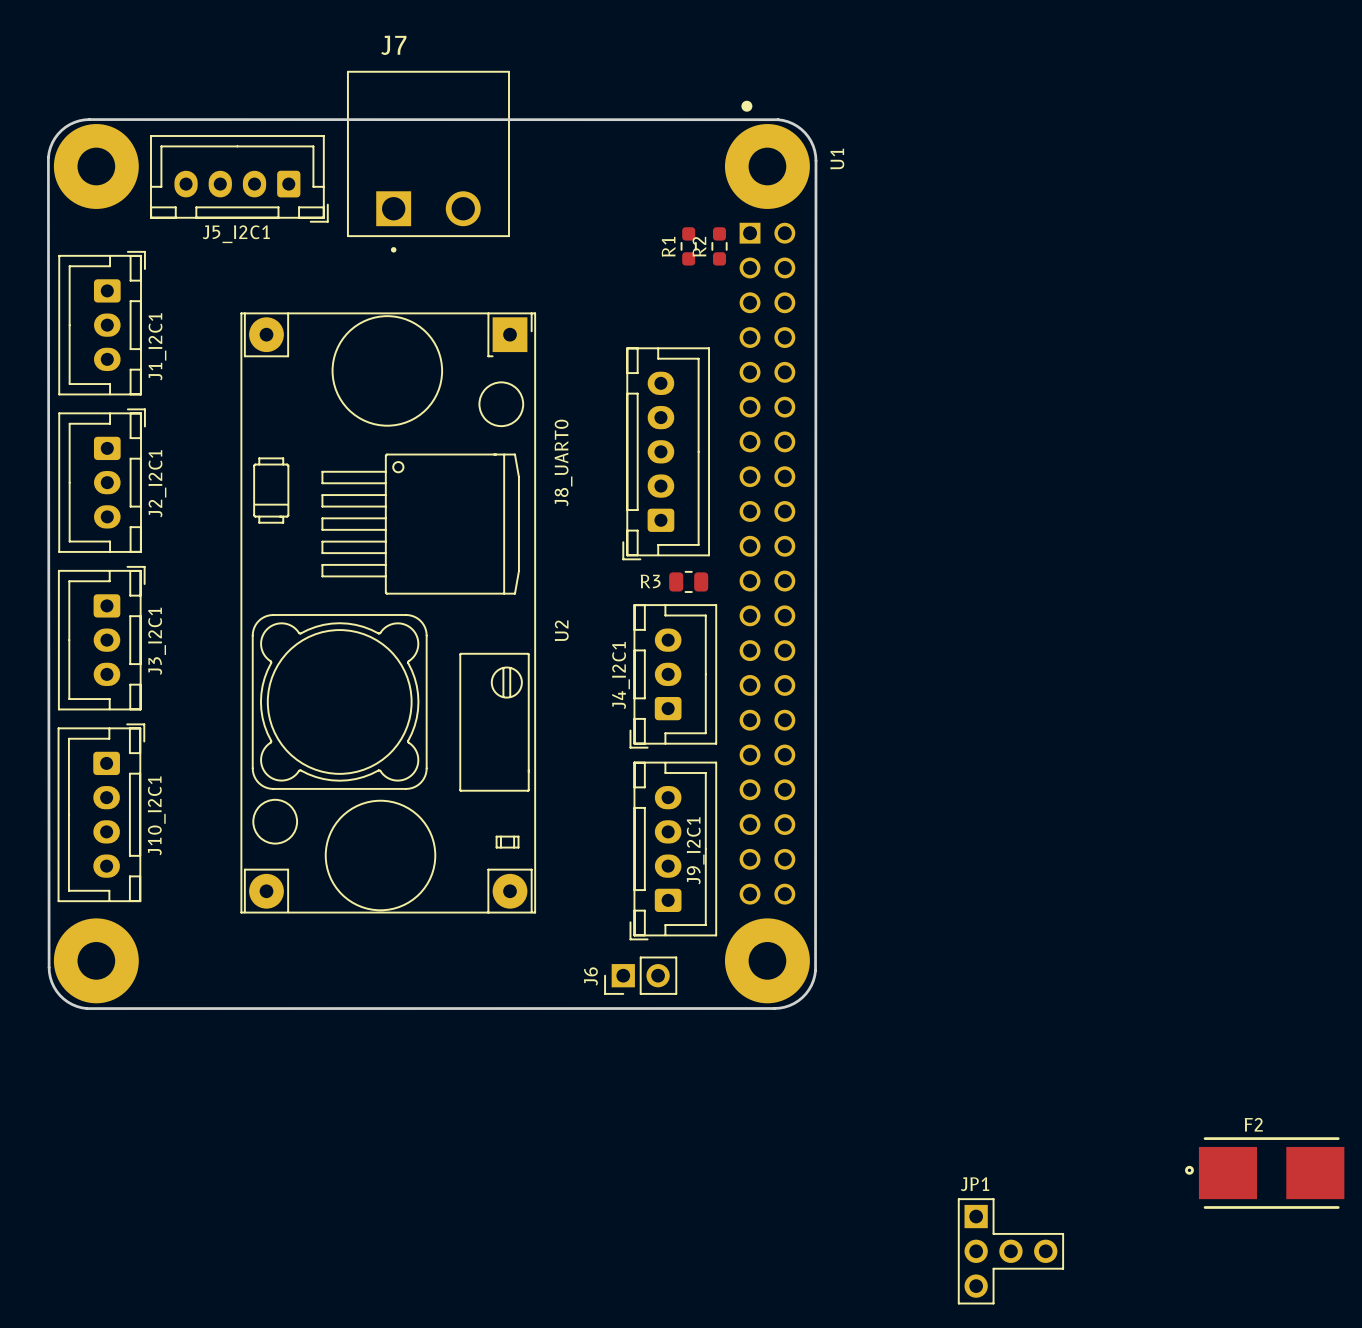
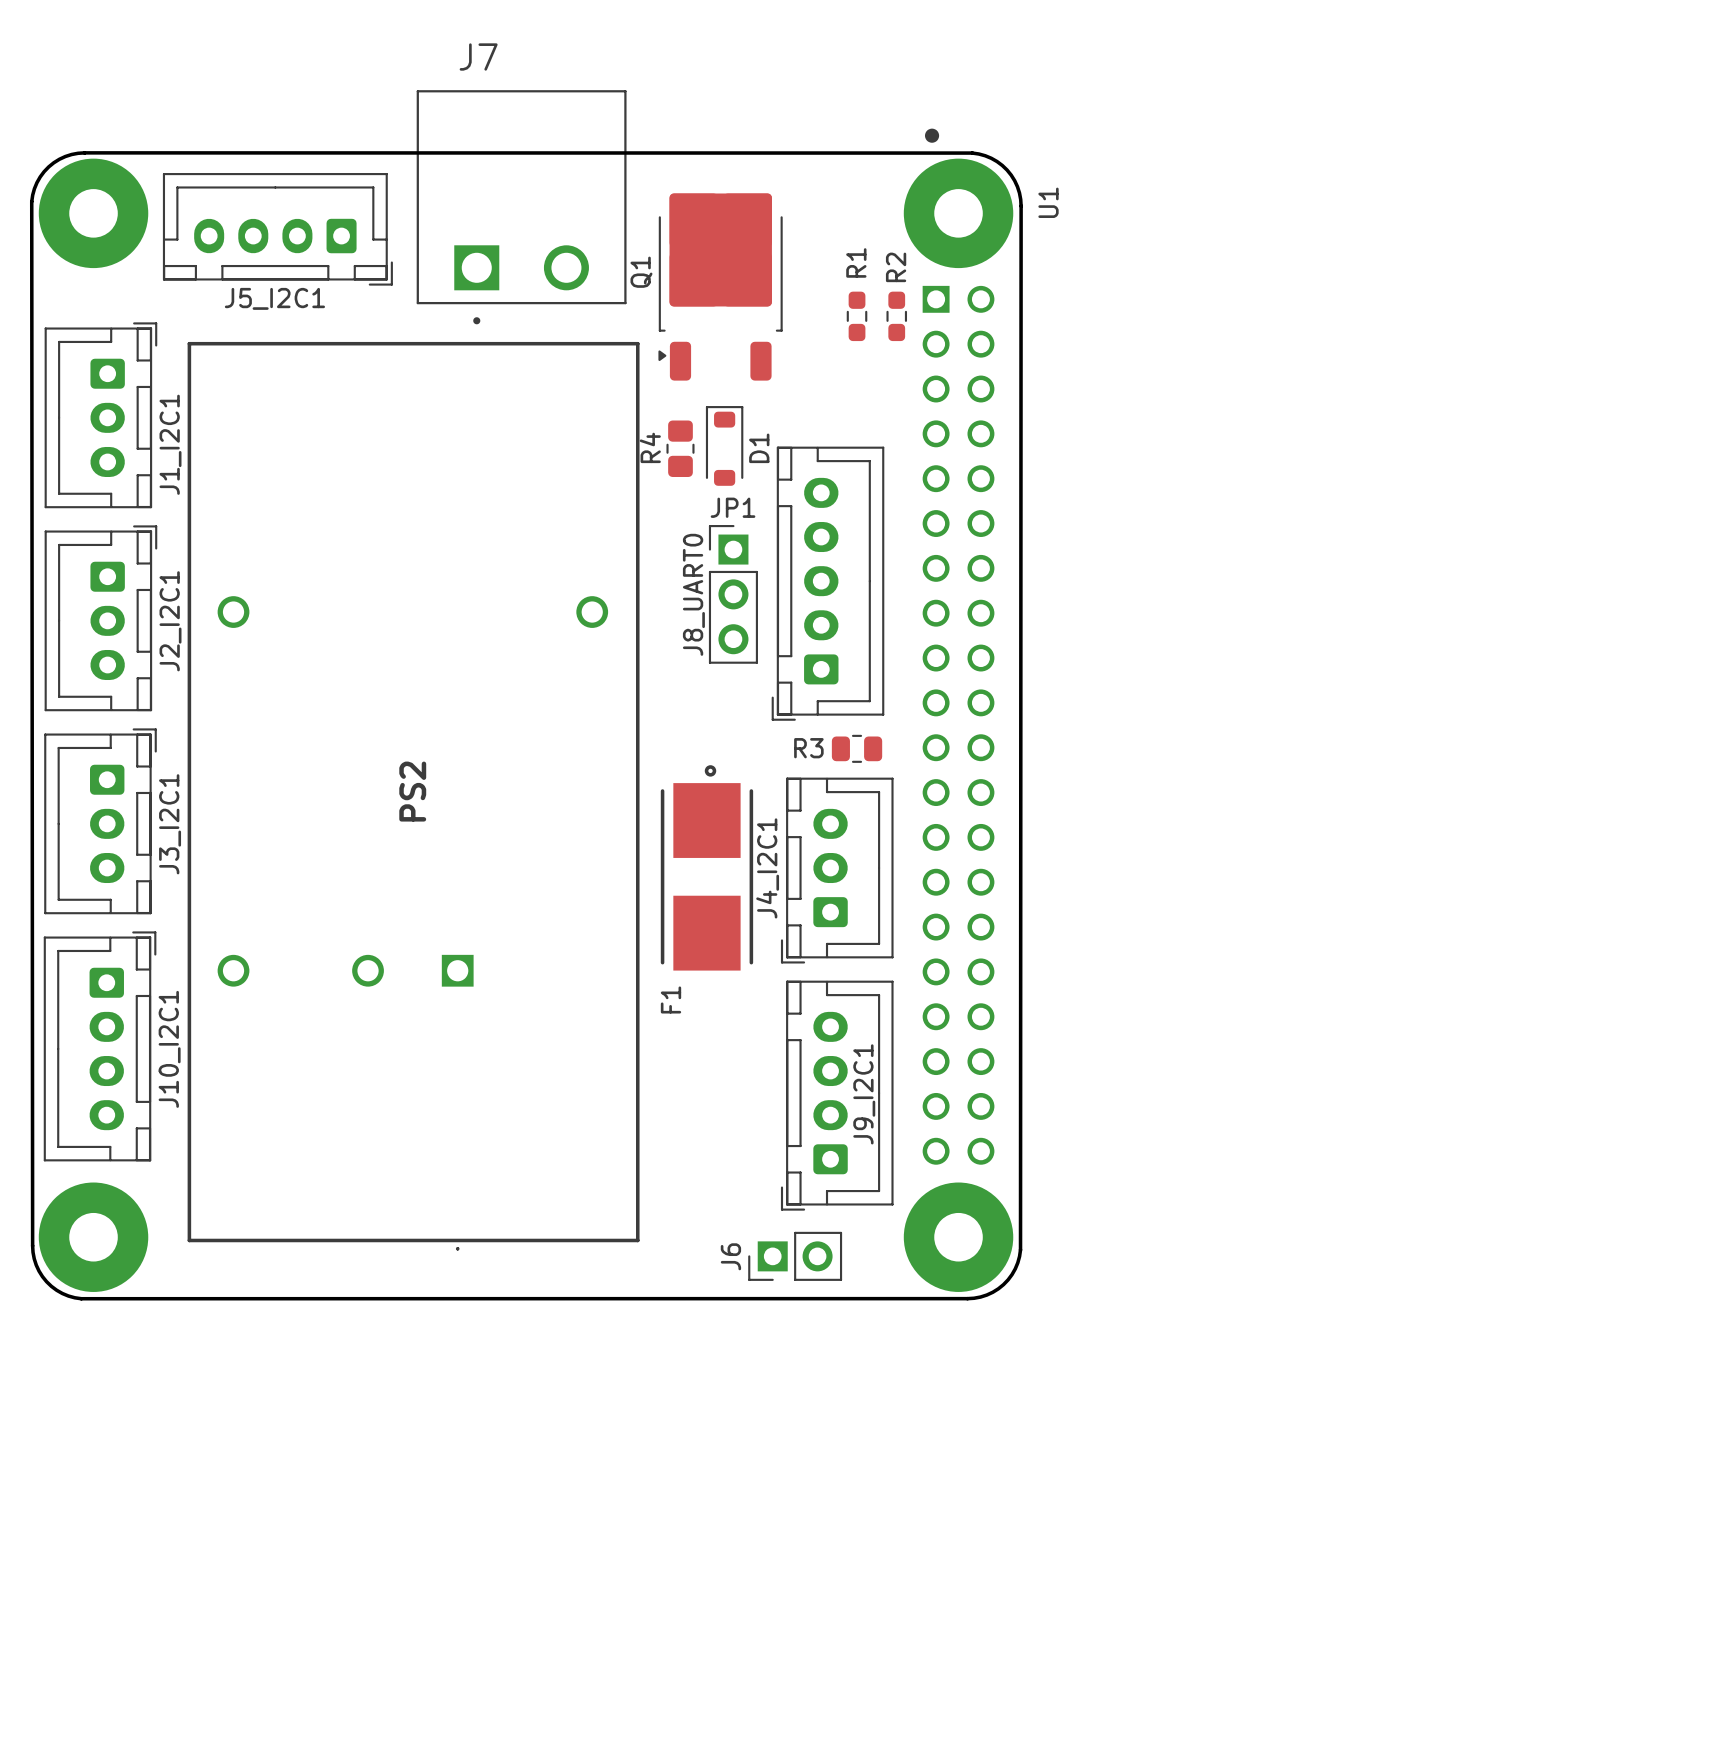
Q1: none -> (720, 287)
R1 name position: R1 (668, 246) -> R1 (856, 262)
R2 name position: R2 (699, 246) -> R2 (896, 267)
D1: none -> (724, 445)
R4: none -> (680, 448)
U2: (388, 613) -> none
PS2: none -> (413, 796)
F1: none -> (706, 867)
F2: (1264, 1173) -> none
JP1 name position: JP1 (975, 1184) -> JP1 (733, 507)
JP1 footprint: [957, 1198, 1064, 1305] -> [708, 525, 758, 664]

